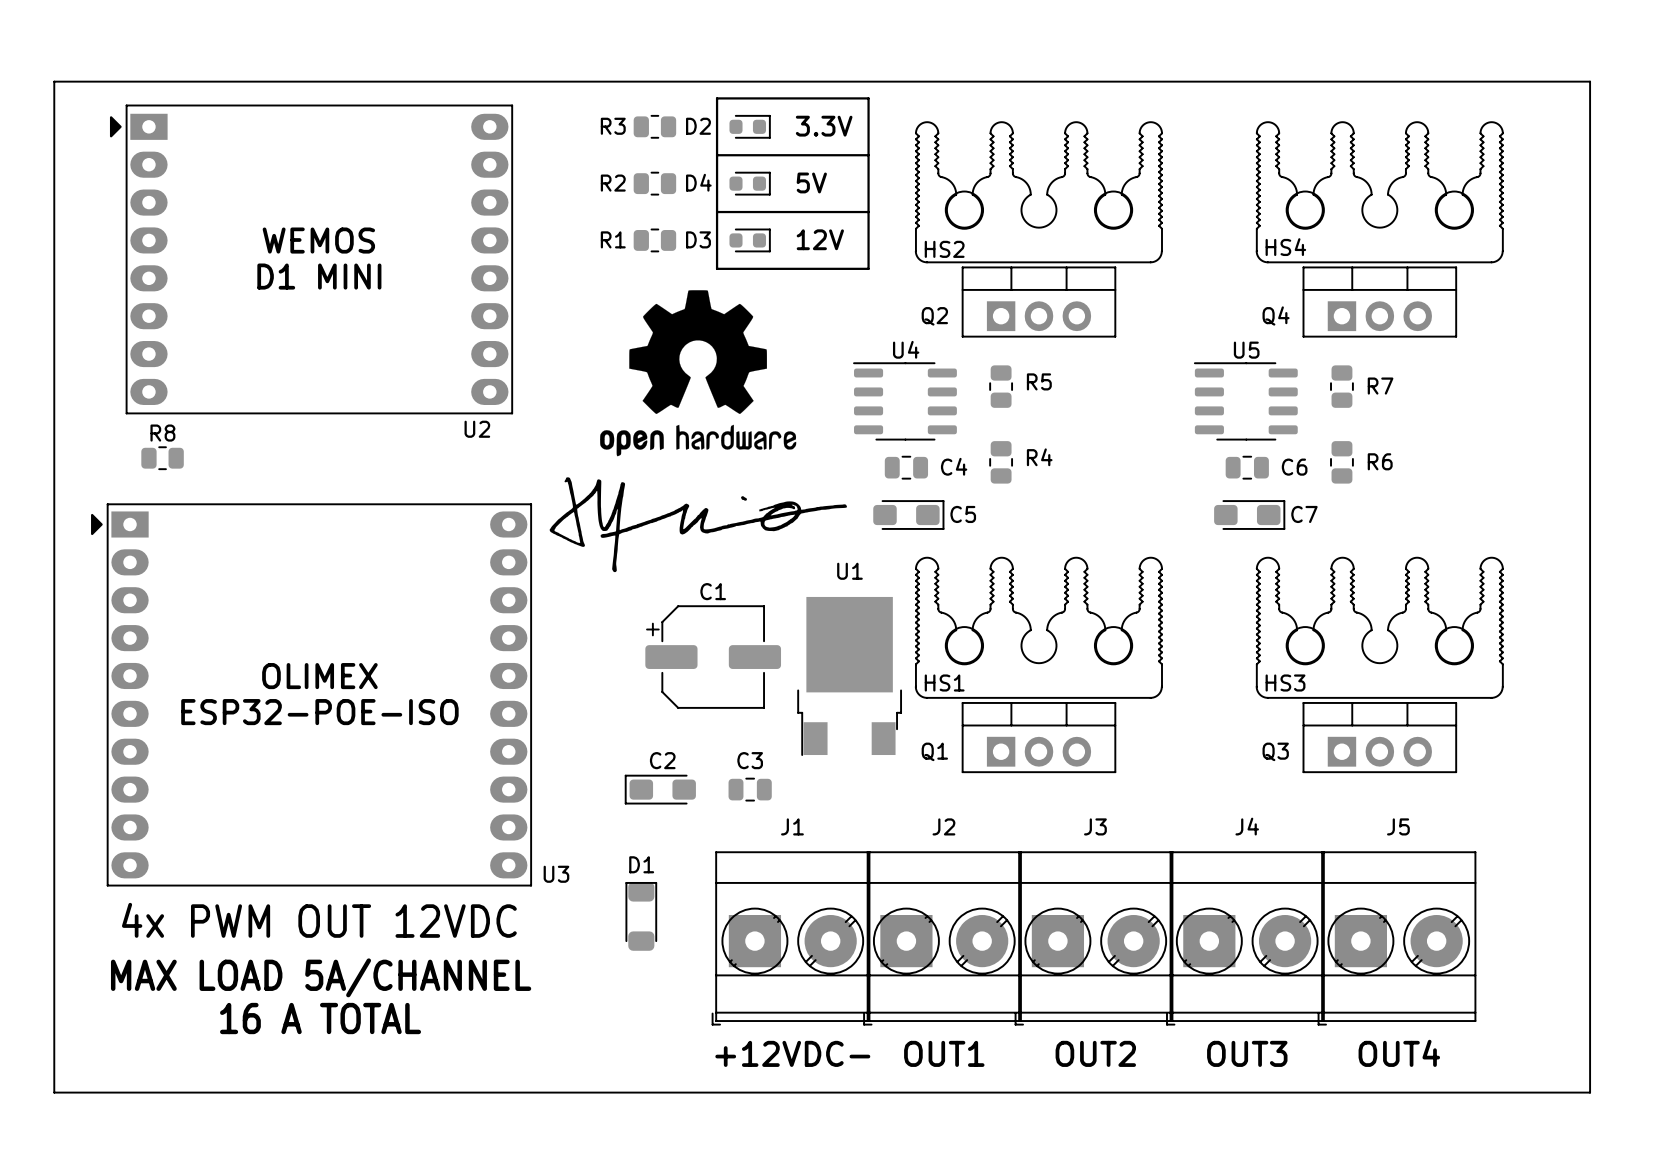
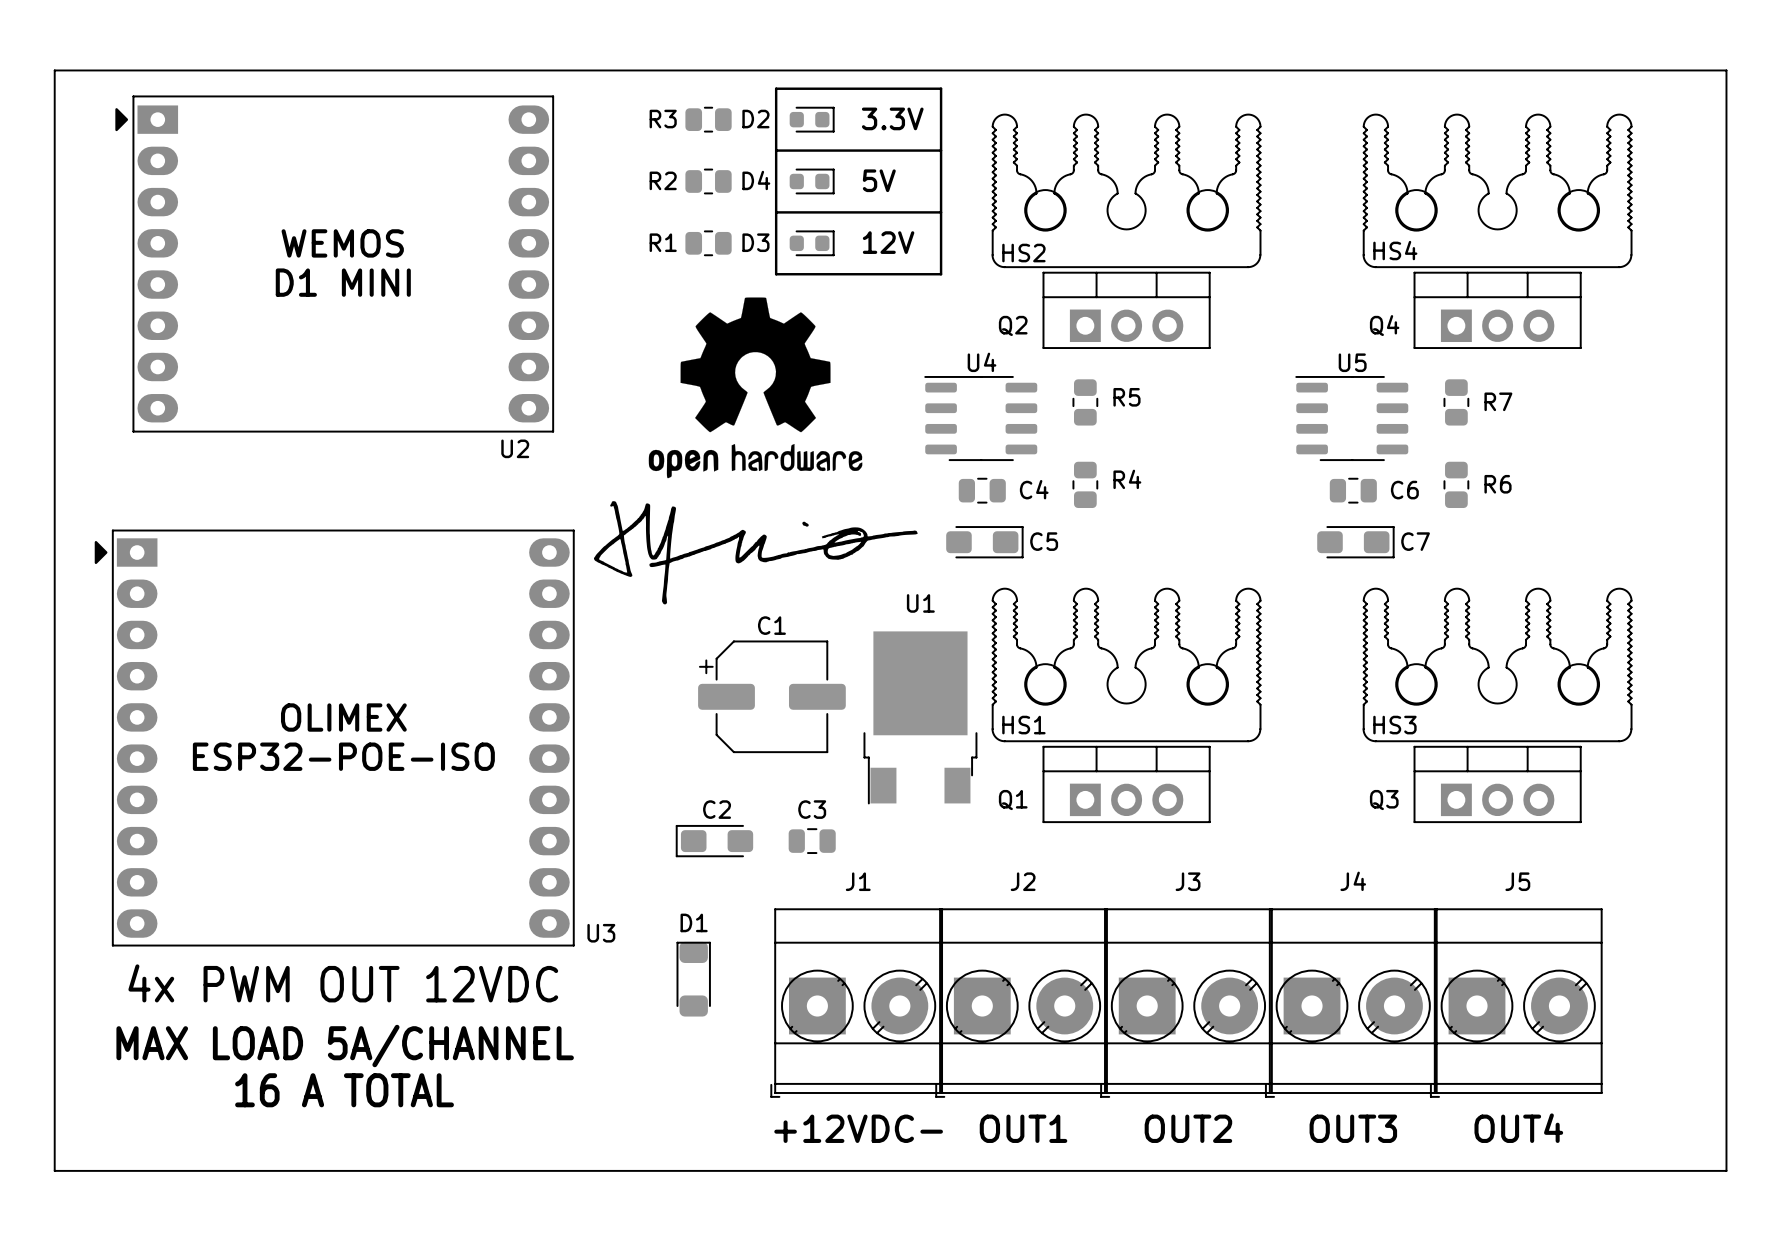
R8: (162, 458) -> none

